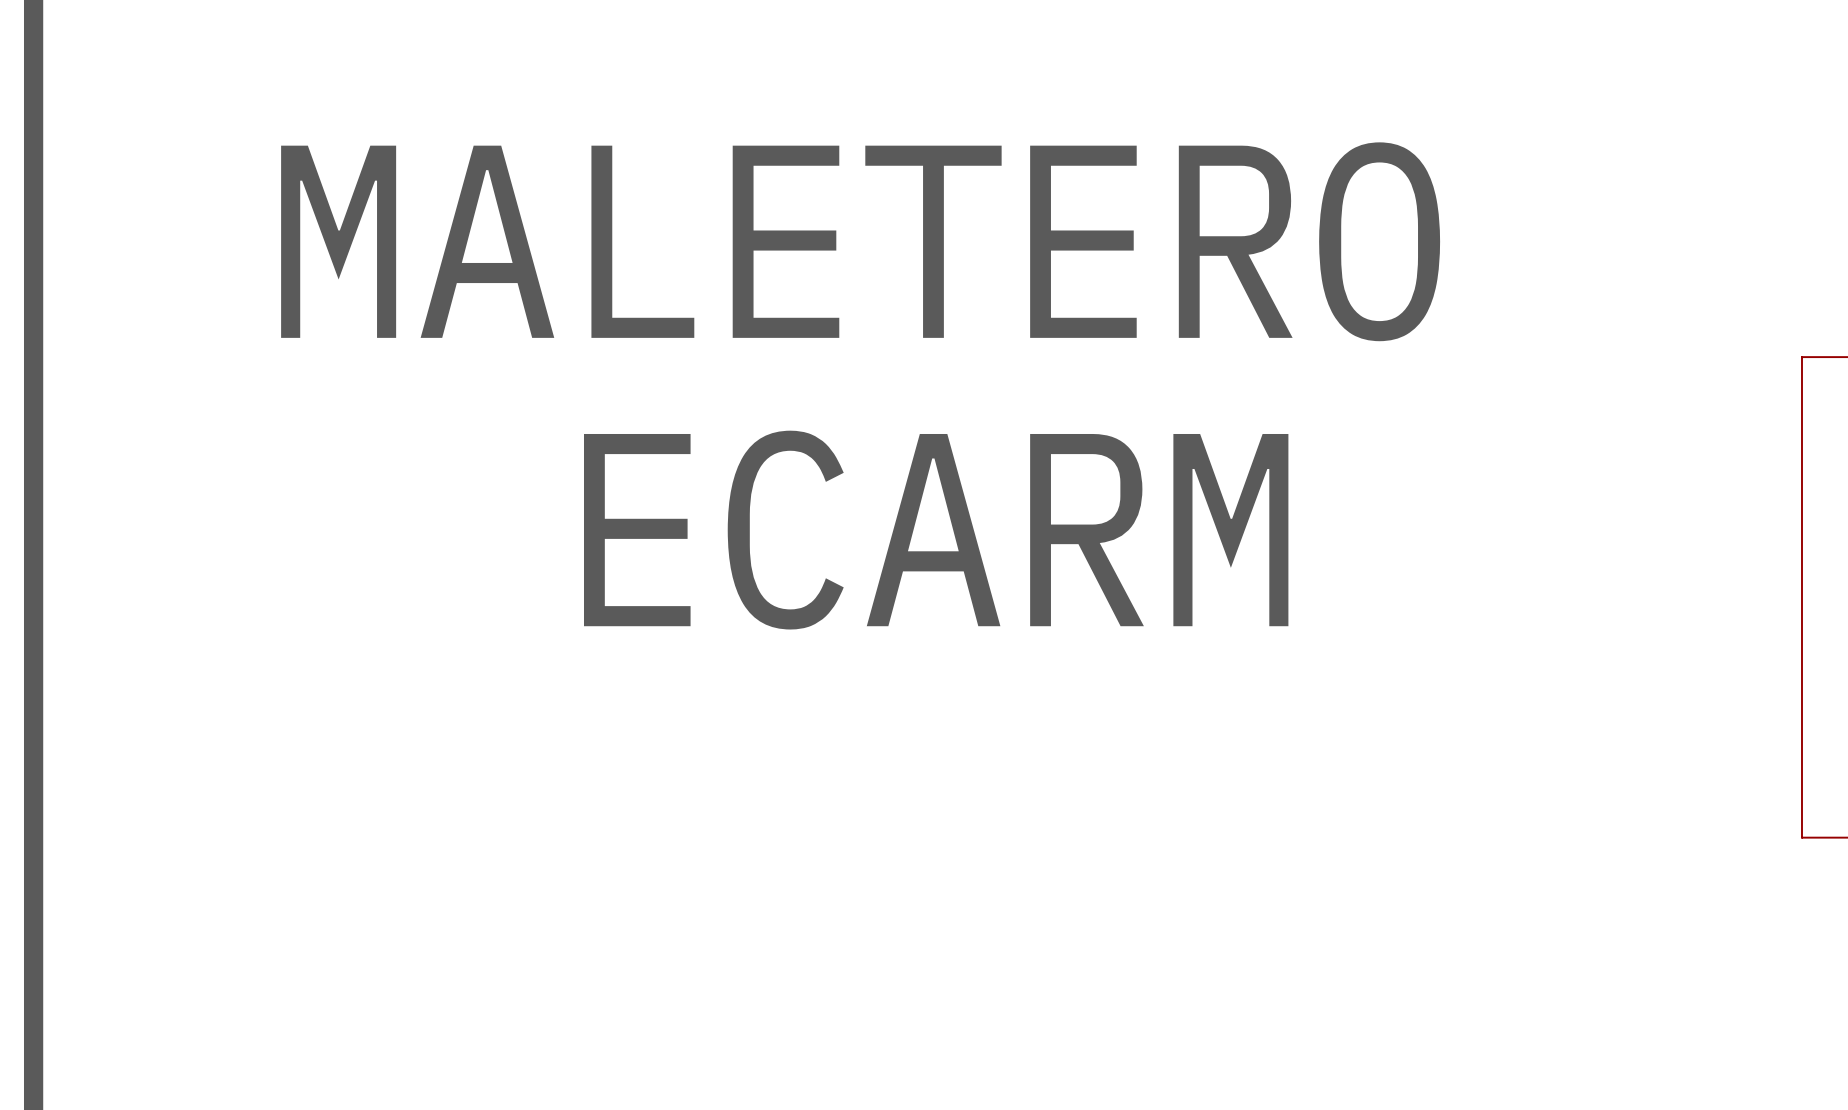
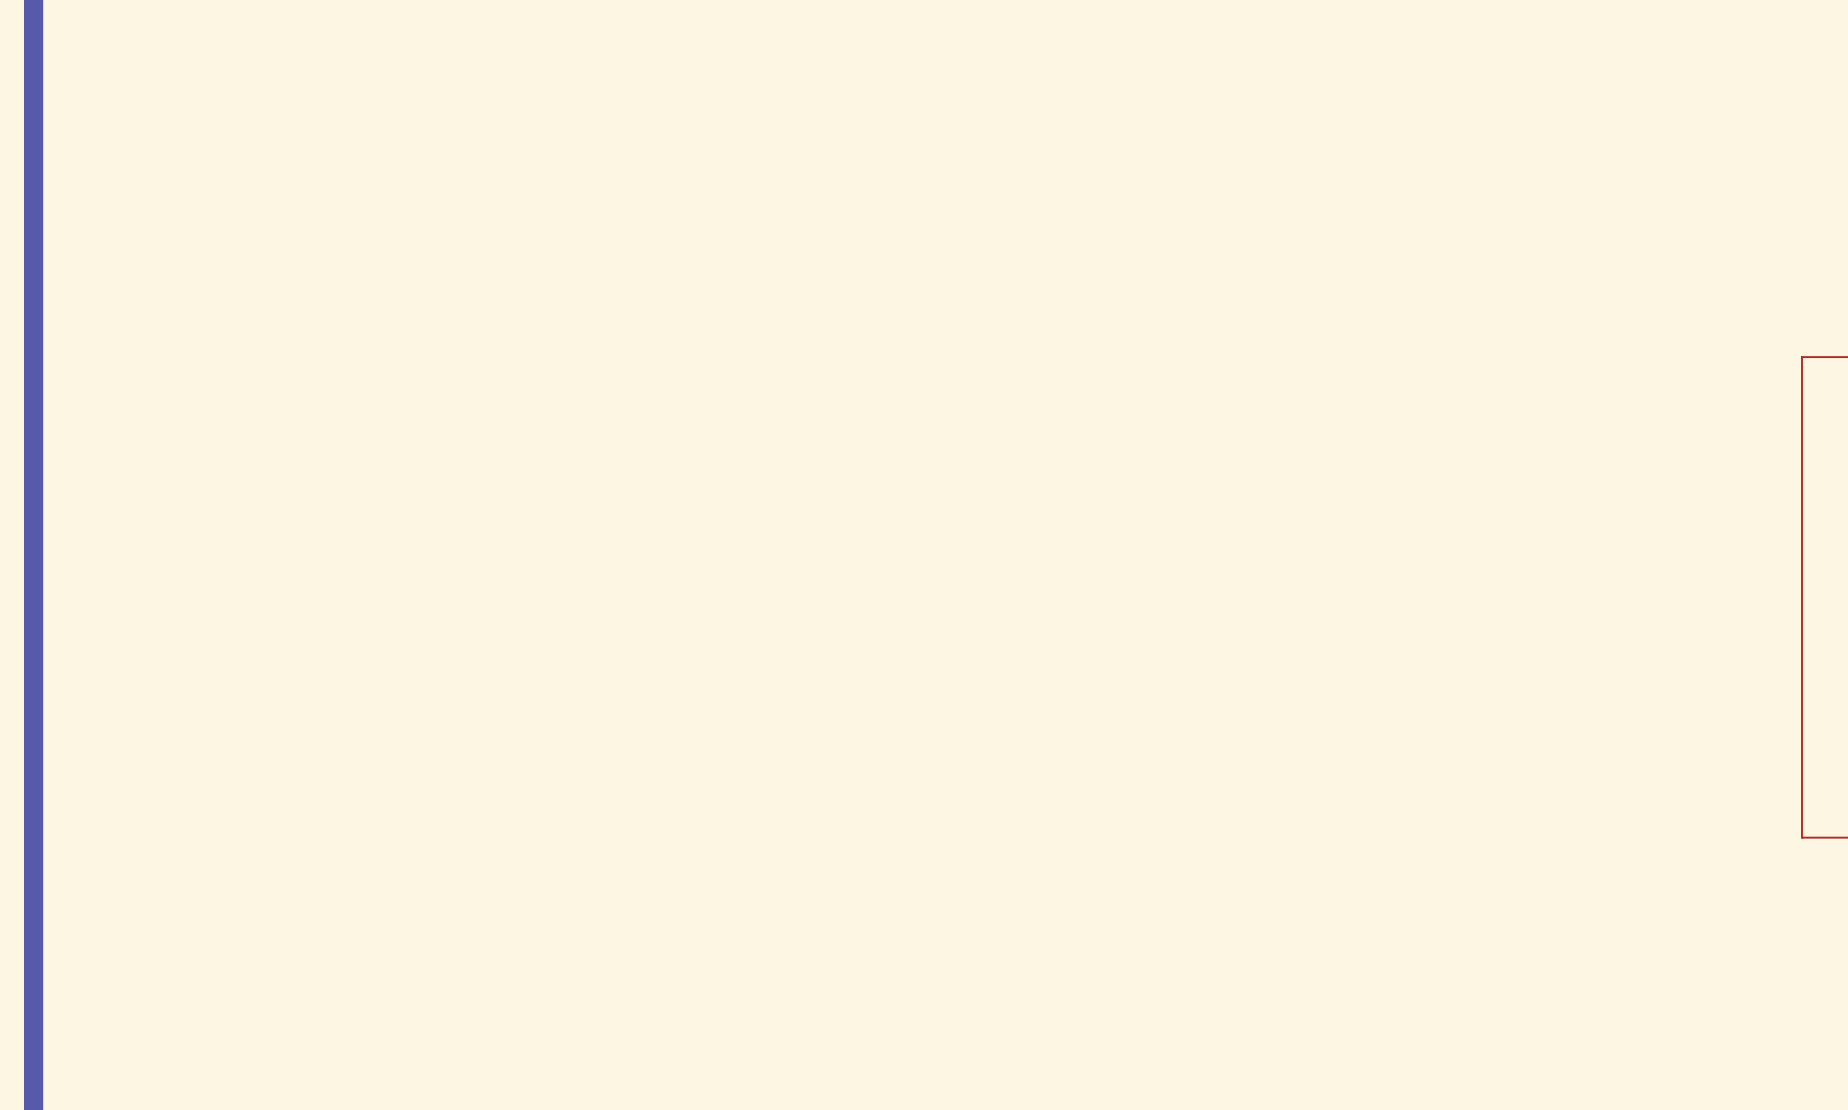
text: MALETERO (860, 241) -> none
text: ECARM (936, 530) -> none

